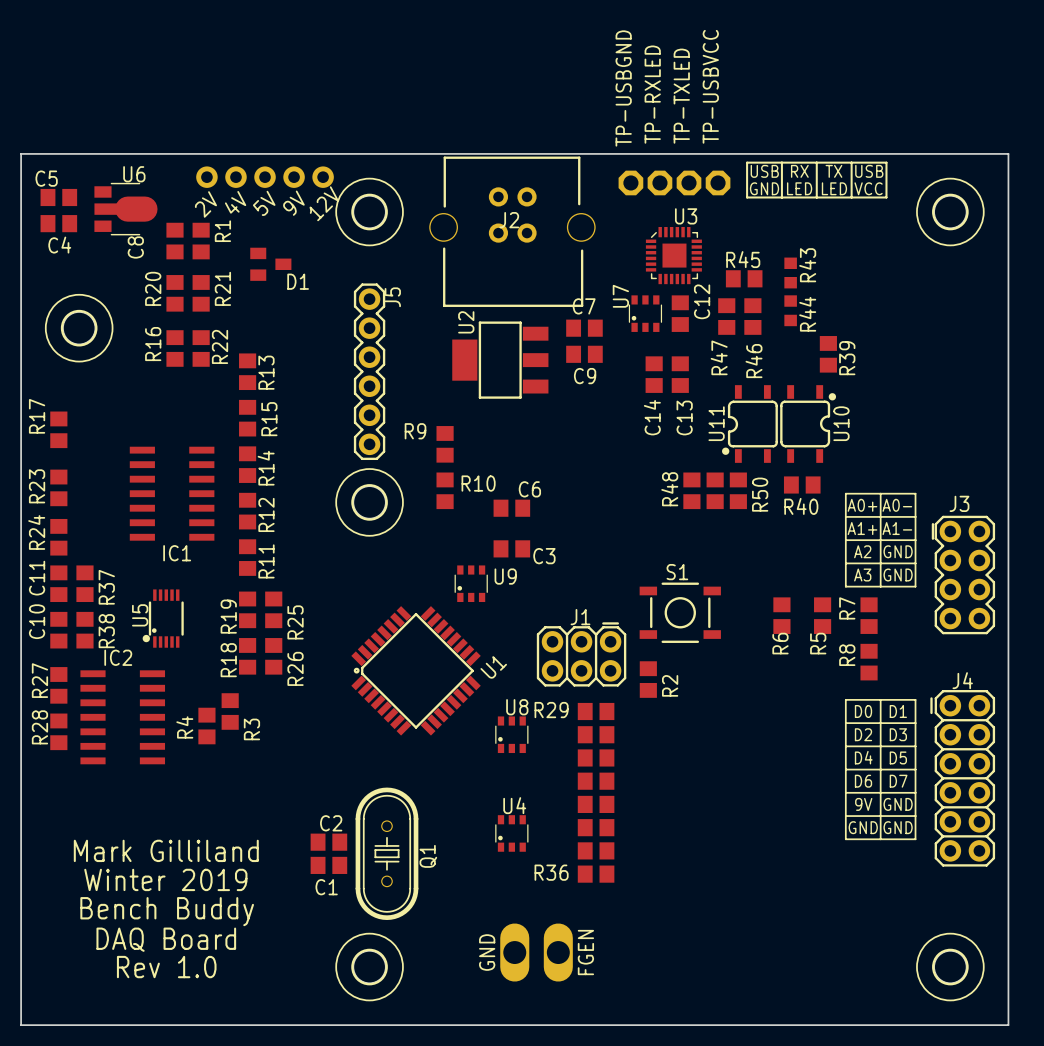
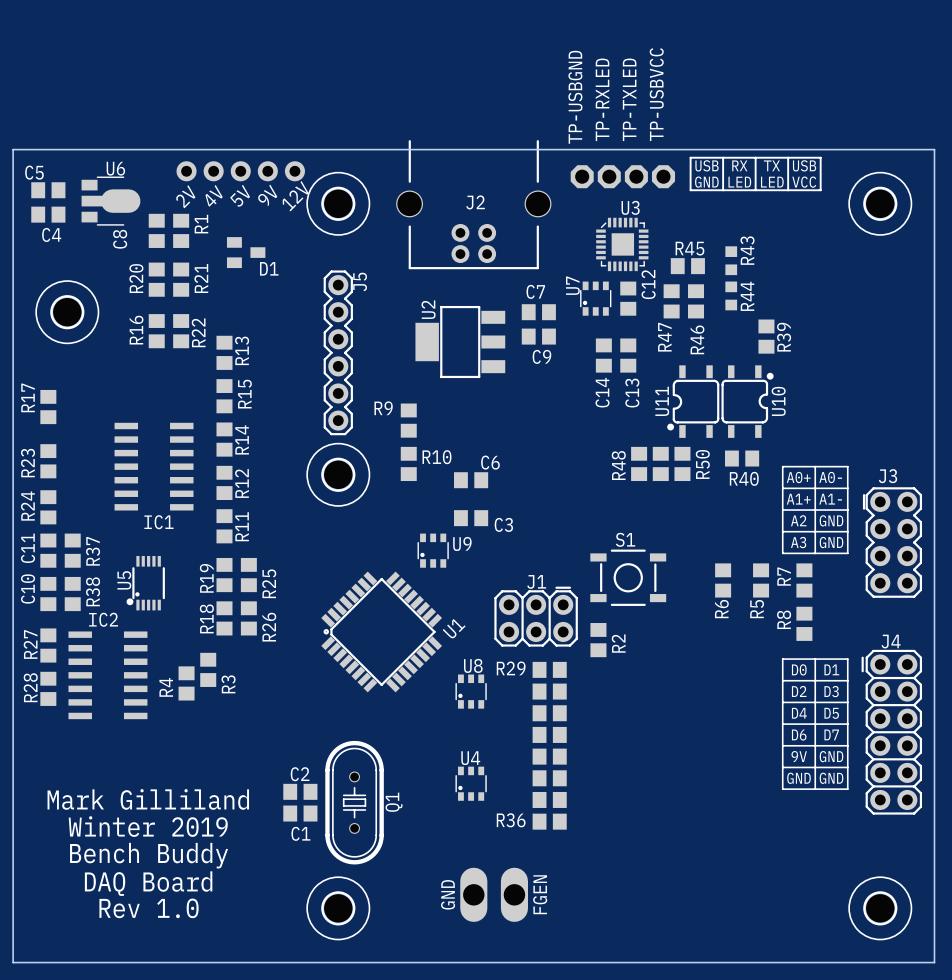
J2 footprint: [429, 156, 596, 307] -> [396, 140, 552, 270]

